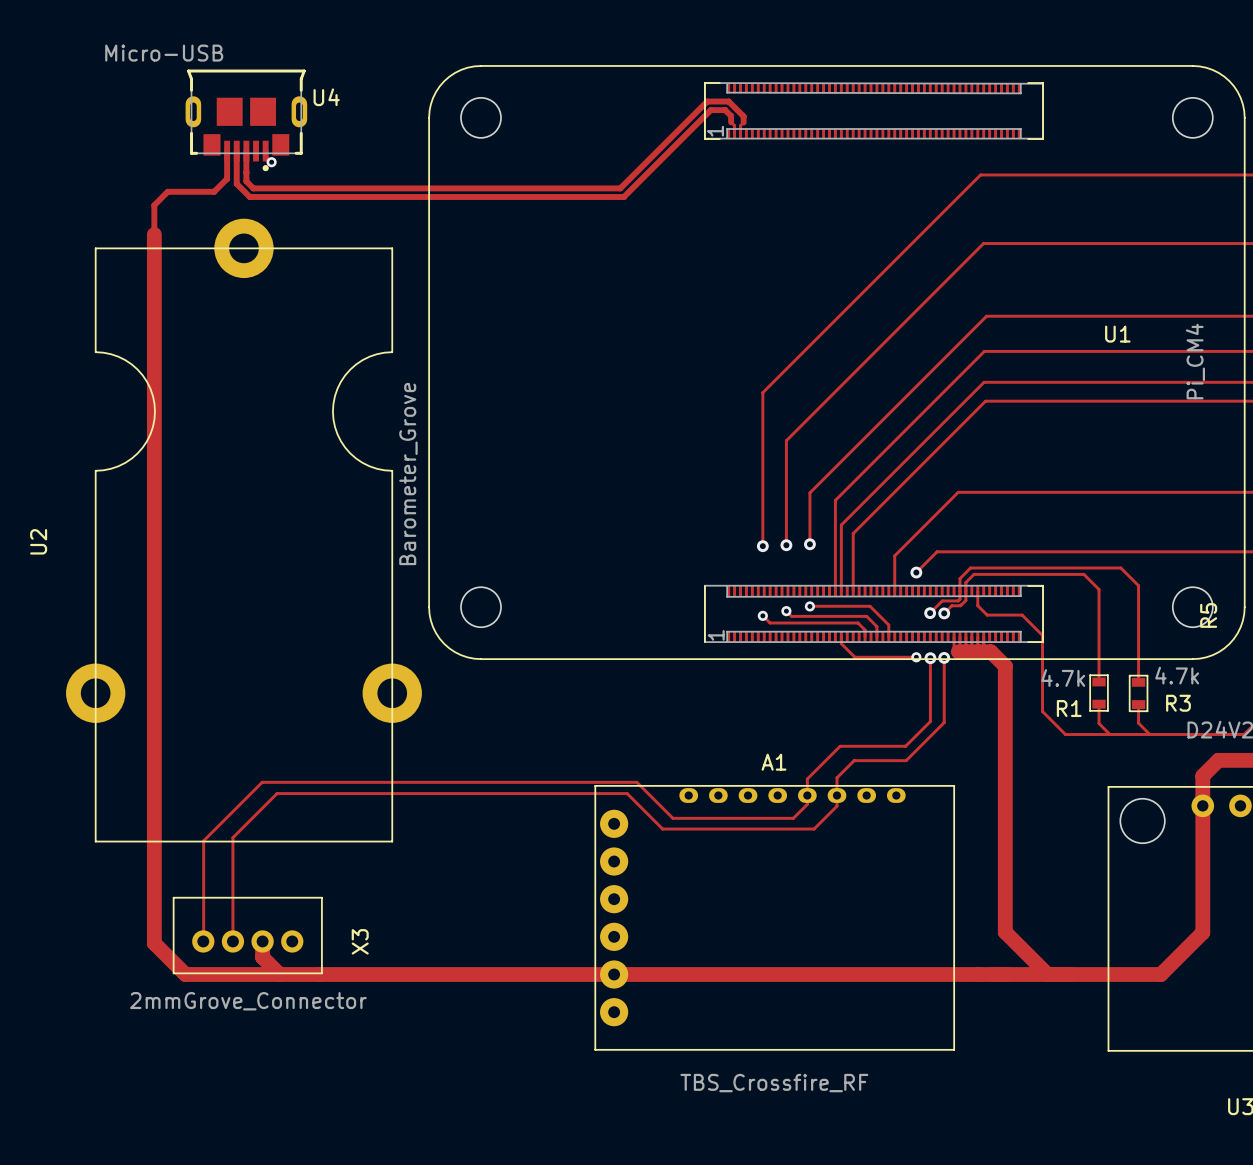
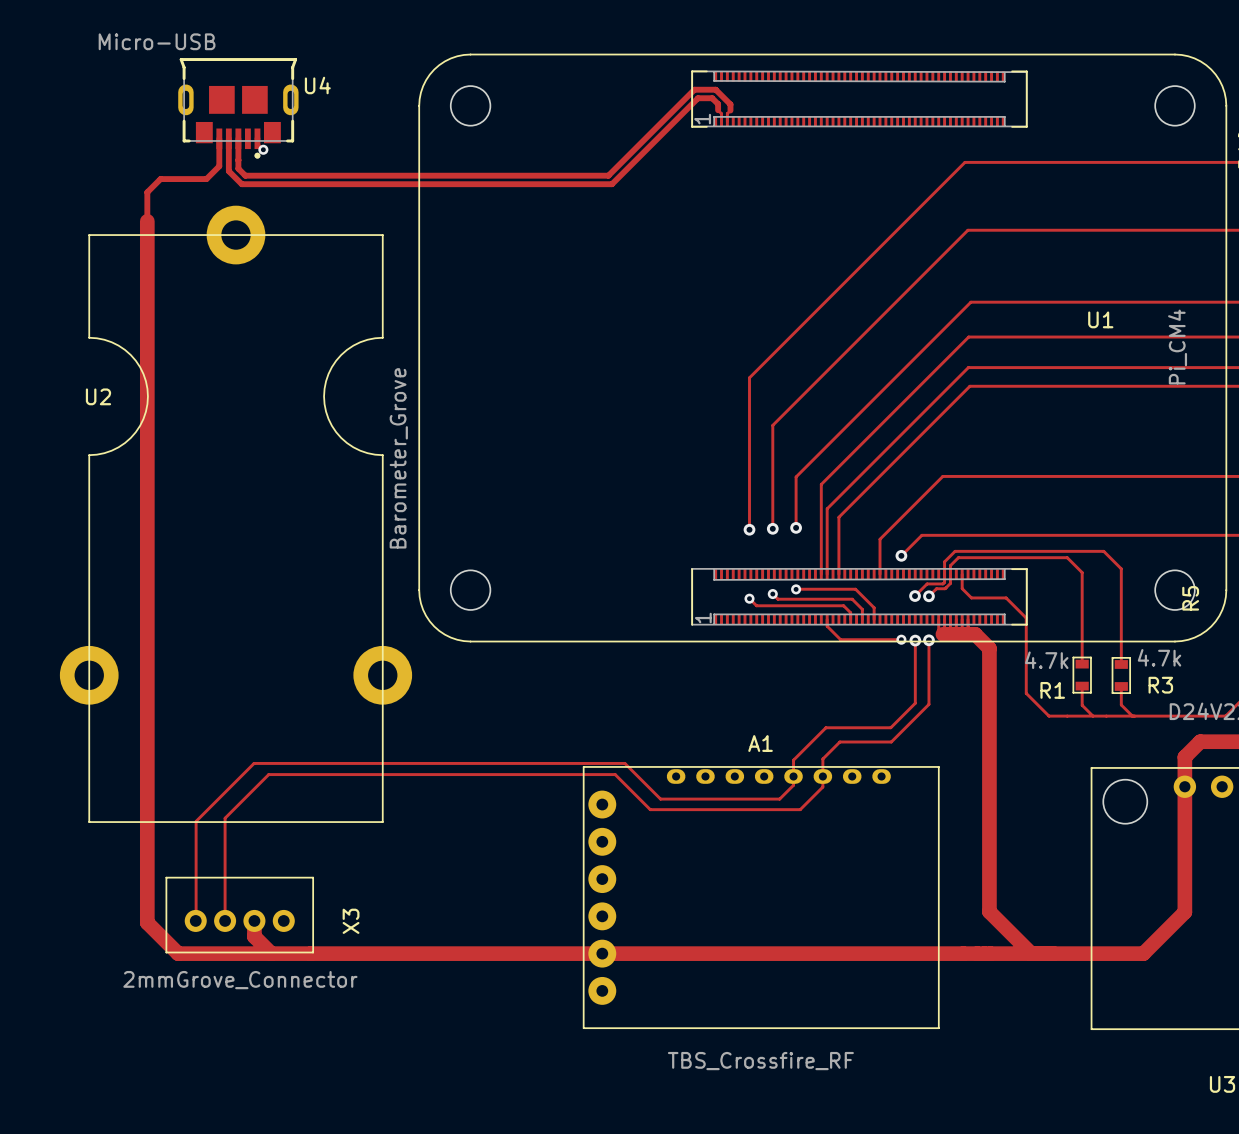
U2 name rotation: 0° (38, 541) -> 90° clockwise (98, 396)
U2 name position: U2 (38, 541) -> U2 (98, 396)

